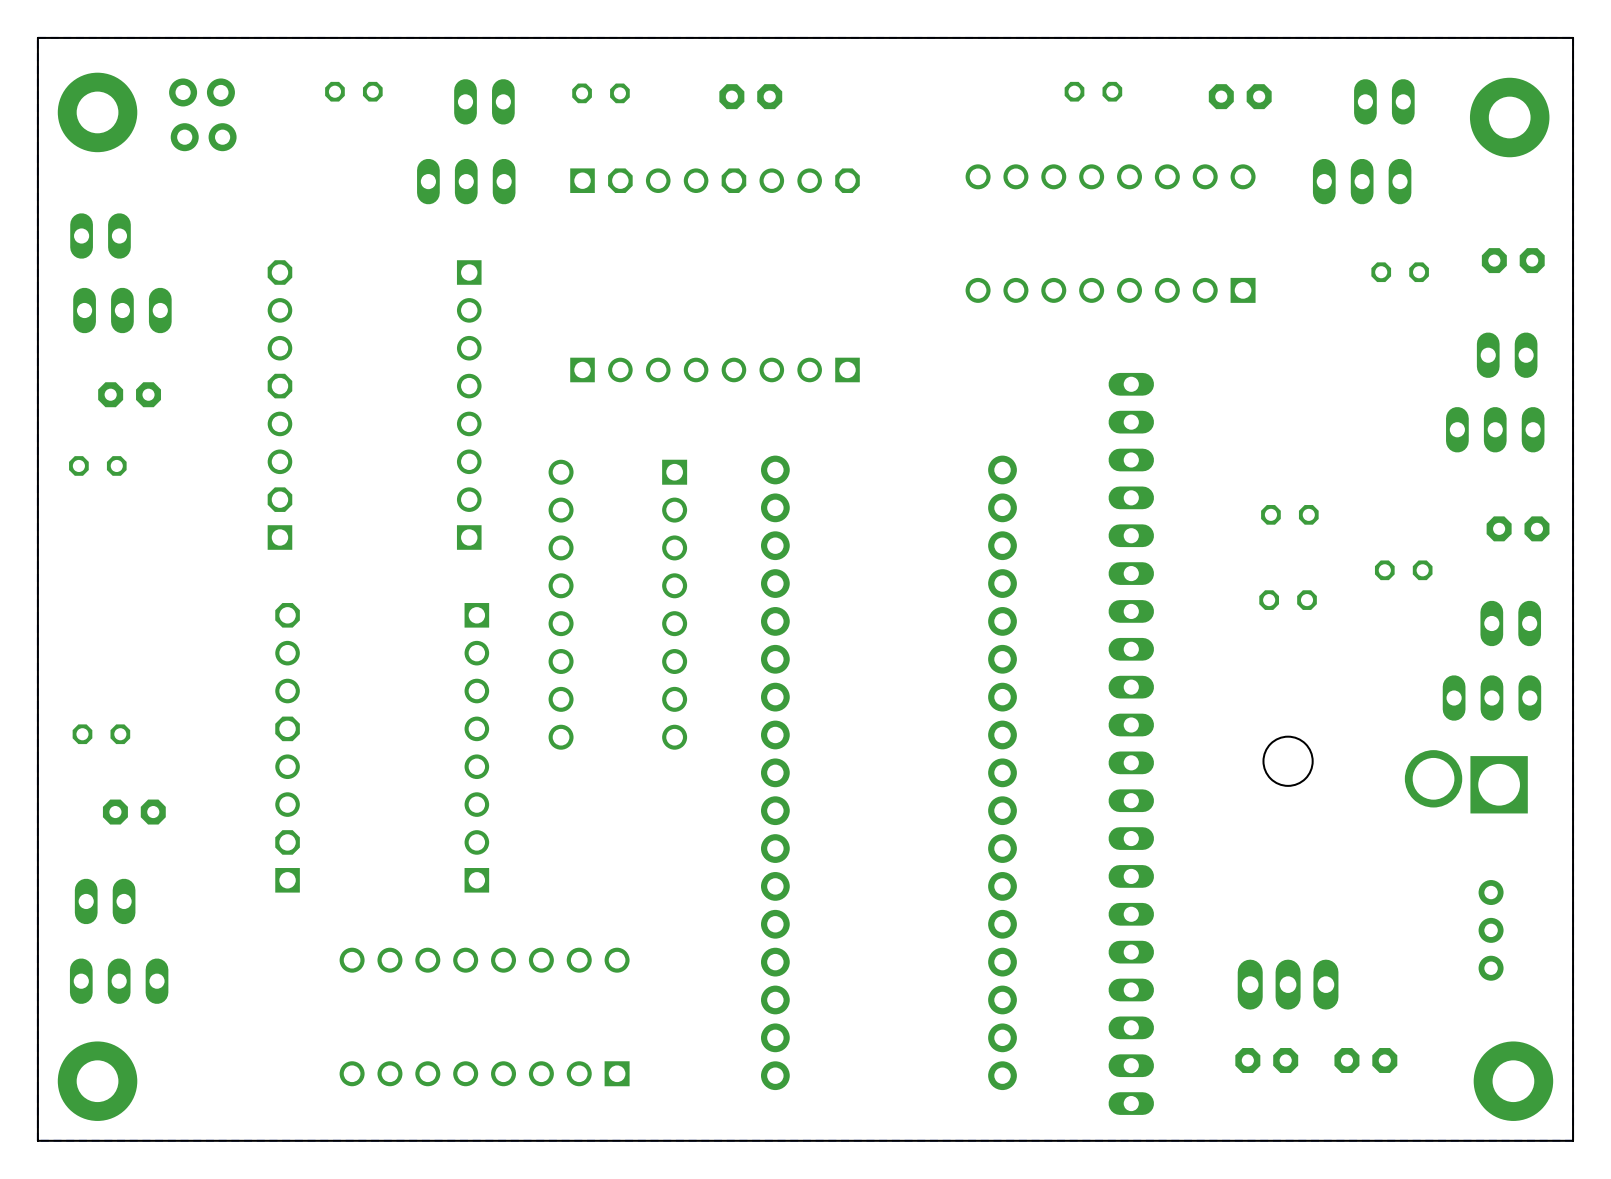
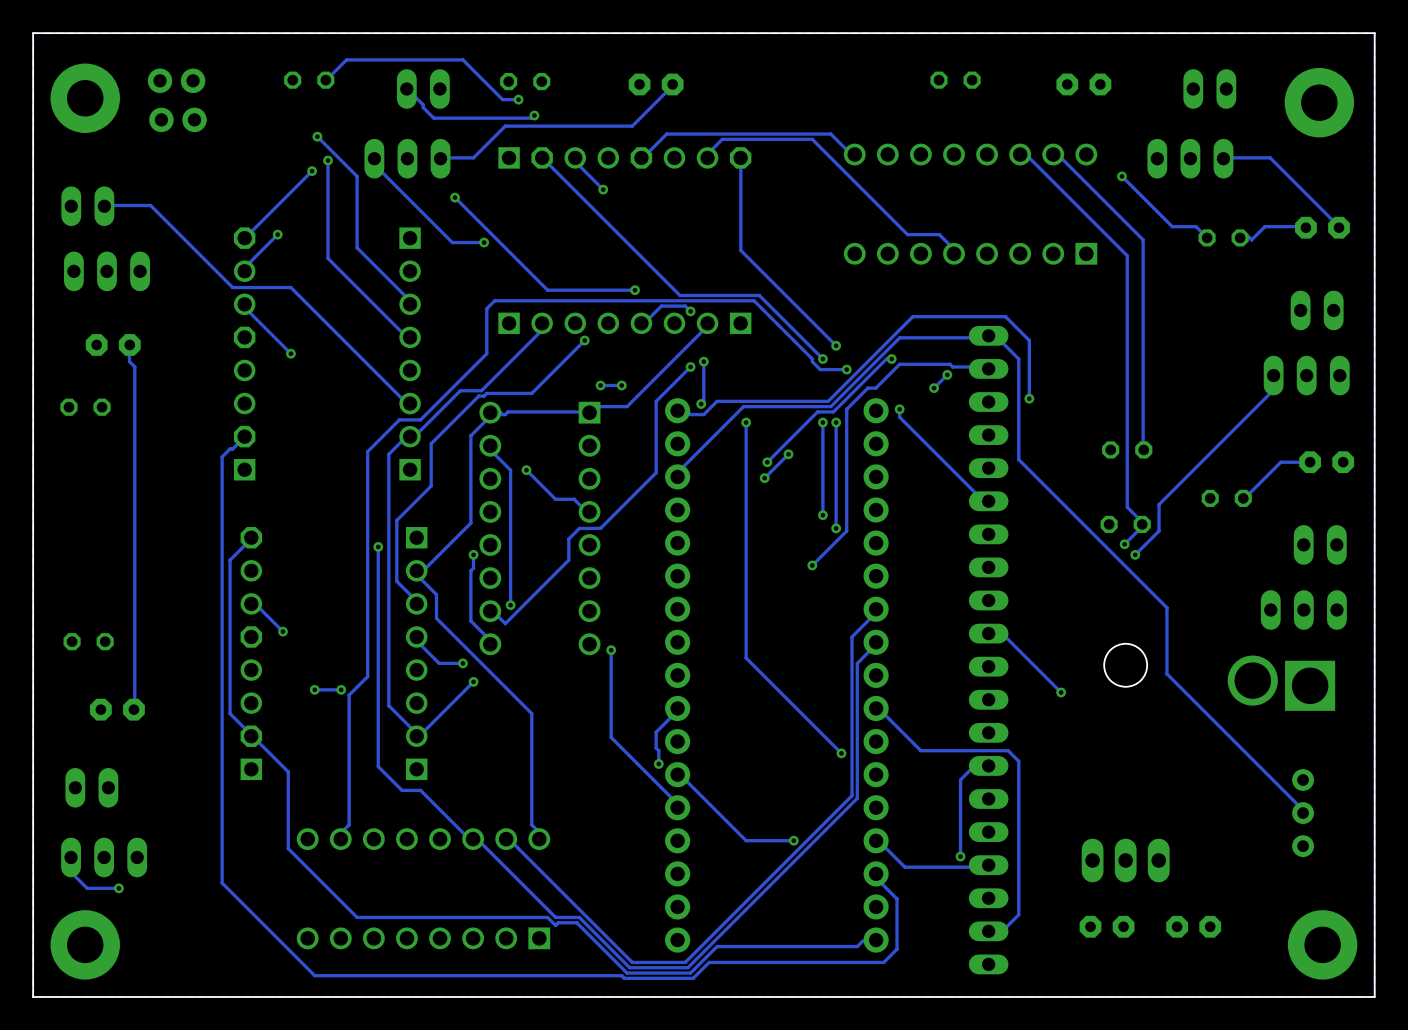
track: none -> (325, 80) (346, 59) (462, 59) (502, 99) (518, 99)
track: none -> (672, 84) (632, 126) (505, 126) (473, 157) (440, 158)
track: none -> (406, 89) (433, 118) (531, 118) (534, 115)
via: none -> (518, 99)
via: none -> (534, 115)
track: none -> (317, 136) (357, 176) (357, 247) (412, 303) (410, 304)
via: none -> (317, 136)
track: none -> (854, 154) (854, 152) (849, 152) (830, 134) (666, 134) (641, 157)
track: none -> (1020, 154) (1026, 155) (1127, 255) (1127, 507) (1143, 523) (1124, 544)
track: none -> (1053, 154) (1058, 155) (1143, 239) (1143, 449)
track: none -> (542, 157) (542, 160) (545, 160) (679, 295) (759, 295) (822, 359)
track: none -> (575, 157) (576, 163) (603, 189)
track: none -> (707, 157) (709, 152) (722, 139) (812, 139) (907, 234) (939, 234) (952, 247) (954, 253)
track: none -> (740, 157) (740, 250) (836, 345)
track: none -> (374, 158) (375, 165) (452, 242) (484, 242)
track: none -> (1223, 158) (1270, 157) (1339, 227)
track: none -> (327, 160) (327, 258) (404, 335) (410, 335) (410, 337)
via: none -> (327, 160)
track: none -> (312, 171) (244, 238)
via: none -> (312, 171)
track: none -> (1121, 176) (1172, 226) (1196, 226) (1207, 237)
via: none -> (1121, 176)
via: none -> (603, 189)
track: none -> (455, 197) (547, 290) (634, 290)
via: none -> (455, 197)
track: none -> (104, 206) (150, 205) (232, 287) (290, 287) (404, 401) (410, 401) (410, 403)
track: none -> (1305, 227) (1264, 226) (1251, 239) (1249, 237) (1240, 237)
track: none -> (277, 234) (245, 266) (244, 271)
via: none -> (277, 234)
via: none -> (484, 242)
via: none -> (634, 290)
track: none -> (244, 304) (245, 308) (290, 353)
track: none -> (690, 311) (685, 306) (661, 306) (642, 324) (641, 323)
via: none -> (690, 311)
track: none -> (542, 323) (539, 324) (539, 332) (481, 390) (460, 390) (412, 438) (410, 436) (410, 438) (404, 438) (388, 454) (388, 705) (415, 732) (416, 736) (420, 734) (473, 681)
track: none -> (707, 323) (706, 327) (627, 406) (595, 406) (589, 412) (507, 411) (505, 414) (500, 411) (490, 412) (492, 414) (470, 435) (470, 523) (423, 570) (416, 570) (415, 573) (436, 594) (436, 618) (531, 713) (531, 824) (537, 830) (537, 838) (539, 839)
track: none -> (584, 340) (531, 393) (486, 393) (484, 396) (478, 396) (431, 443) (431, 486) (396, 520) (396, 581) (417, 602) (416, 603)
via: none -> (584, 340)
track: none -> (129, 344) (129, 361) (134, 366) (133, 709)
via: none -> (836, 345)
via: none -> (290, 353)
via: none -> (822, 359)
track: none -> (891, 359) (886, 359) (833, 411) (817, 411) (767, 462)
via: none -> (891, 359)
track: none -> (703, 361) (703, 401) (701, 404)
via: none -> (703, 361)
track: none -> (690, 366) (656, 401) (656, 472) (600, 528) (579, 528) (568, 538) (568, 560) (505, 623) (490, 611)
via: none -> (690, 366)
track: none -> (846, 369) (820, 369) (812, 361) (812, 359) (754, 300) (494, 300) (486, 308) (486, 353) (420, 419) (399, 419) (367, 451) (367, 676) (349, 695) (349, 824) (341, 832) (340, 839)
via: none -> (846, 369)
track: none -> (988, 368) (987, 366) (952, 366) (949, 364) (899, 364) (875, 388) (867, 388) (846, 409) (846, 531) (812, 565)
track: none -> (947, 374) (934, 388)
via: none -> (947, 374)
track: none -> (1273, 375) (1272, 390) (1159, 504) (1159, 531) (1135, 554)
via: none -> (600, 385)
track: none -> (621, 385) (600, 385)
via: none -> (621, 385)
via: none -> (934, 388)
track: none -> (1029, 398) (1029, 340) (1005, 316) (912, 316) (828, 401) (717, 401) (703, 414) (690, 414) (687, 411) (677, 410)
via: none -> (1029, 398)
via: none -> (701, 404)
track: none -> (899, 409) (899, 417) (981, 499) (988, 501)
via: none -> (899, 409)
track: none -> (746, 422) (746, 658) (841, 753)
via: none -> (746, 422)
track: none -> (822, 422) (822, 515)
via: none -> (822, 422)
track: none -> (836, 422) (836, 528)
via: none -> (836, 422)
track: none -> (244, 436) (222, 456) (222, 883) (314, 975) (621, 975) (624, 978) (693, 978) (709, 962) (883, 962) (897, 949) (897, 898) (878, 880) (878, 875) (876, 873)
track: none -> (490, 445) (492, 446) (492, 451) (510, 470) (510, 605)
track: none -> (788, 454) (764, 478)
via: none -> (788, 454)
via: none -> (767, 462)
track: none -> (1309, 462) (1280, 462) (1243, 498)
track: none -> (526, 470) (555, 499) (574, 499) (587, 512) (589, 511)
via: none -> (526, 470)
track: none -> (677, 476) (679, 475) (679, 470) (743, 406) (830, 406) (899, 337) (987, 337) (988, 335) (989, 337) (997, 337) (1018, 359) (1018, 459) (1166, 607) (1166, 673) (1301, 808) (1303, 813)
via: none -> (764, 478)
via: none -> (822, 515)
via: none -> (836, 528)
track: none -> (251, 537) (230, 560) (230, 713) (288, 771) (288, 848) (357, 917) (547, 917) (555, 925) (558, 922) (576, 922) (627, 973) (690, 973) (717, 946) (857, 946) (862, 941) (876, 940)
via: none -> (1124, 544)
track: none -> (378, 546) (378, 766) (402, 790) (420, 790) (468, 838) (478, 840) (555, 917) (579, 917) (629, 967) (687, 967) (857, 798) (857, 663) (876, 642)
via: none -> (378, 546)
track: none -> (473, 554) (473, 568) (470, 570) (470, 621) (492, 642) (490, 644)
via: none -> (473, 554)
via: none -> (1135, 554)
via: none -> (812, 565)
track: none -> (251, 603) (256, 605) (282, 631)
via: none -> (510, 605)
track: none -> (876, 609) (878, 610) (852, 636) (852, 795) (685, 962) (632, 962) (510, 840) (506, 839)
via: none -> (282, 631)
track: none -> (988, 633) (1002, 634) (1061, 692)
track: none -> (416, 636) (415, 639) (439, 663) (462, 663)
track: none -> (611, 650) (611, 737) (679, 806) (677, 807)
via: none -> (611, 650)
via: none -> (462, 663)
via: none -> (473, 681)
via: none -> (314, 689)
track: none -> (341, 689) (314, 689)
via: none -> (341, 689)
via: none -> (1061, 692)
track: none -> (677, 708) (677, 711) (656, 732) (658, 763)
track: none -> (876, 708) (878, 708) (920, 750) (1008, 750) (1018, 761) (1018, 914) (1002, 930) (988, 931)
via: none -> (841, 753)
via: none -> (658, 763)
track: none -> (988, 765) (973, 766) (960, 779) (960, 856)
track: none -> (677, 774) (679, 774) (746, 840) (793, 840)
via: none -> (793, 840)
track: none -> (876, 840) (878, 840) (904, 867) (987, 867) (988, 865)
via: none -> (960, 856)
track: none -> (71, 857) (71, 872) (87, 888) (118, 888)
via: none -> (118, 888)

